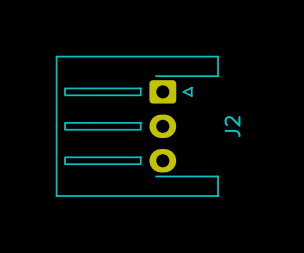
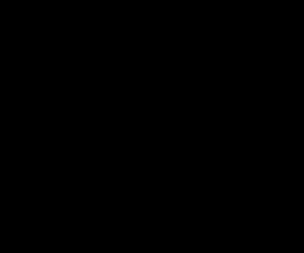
J2: (137, 126) -> none

